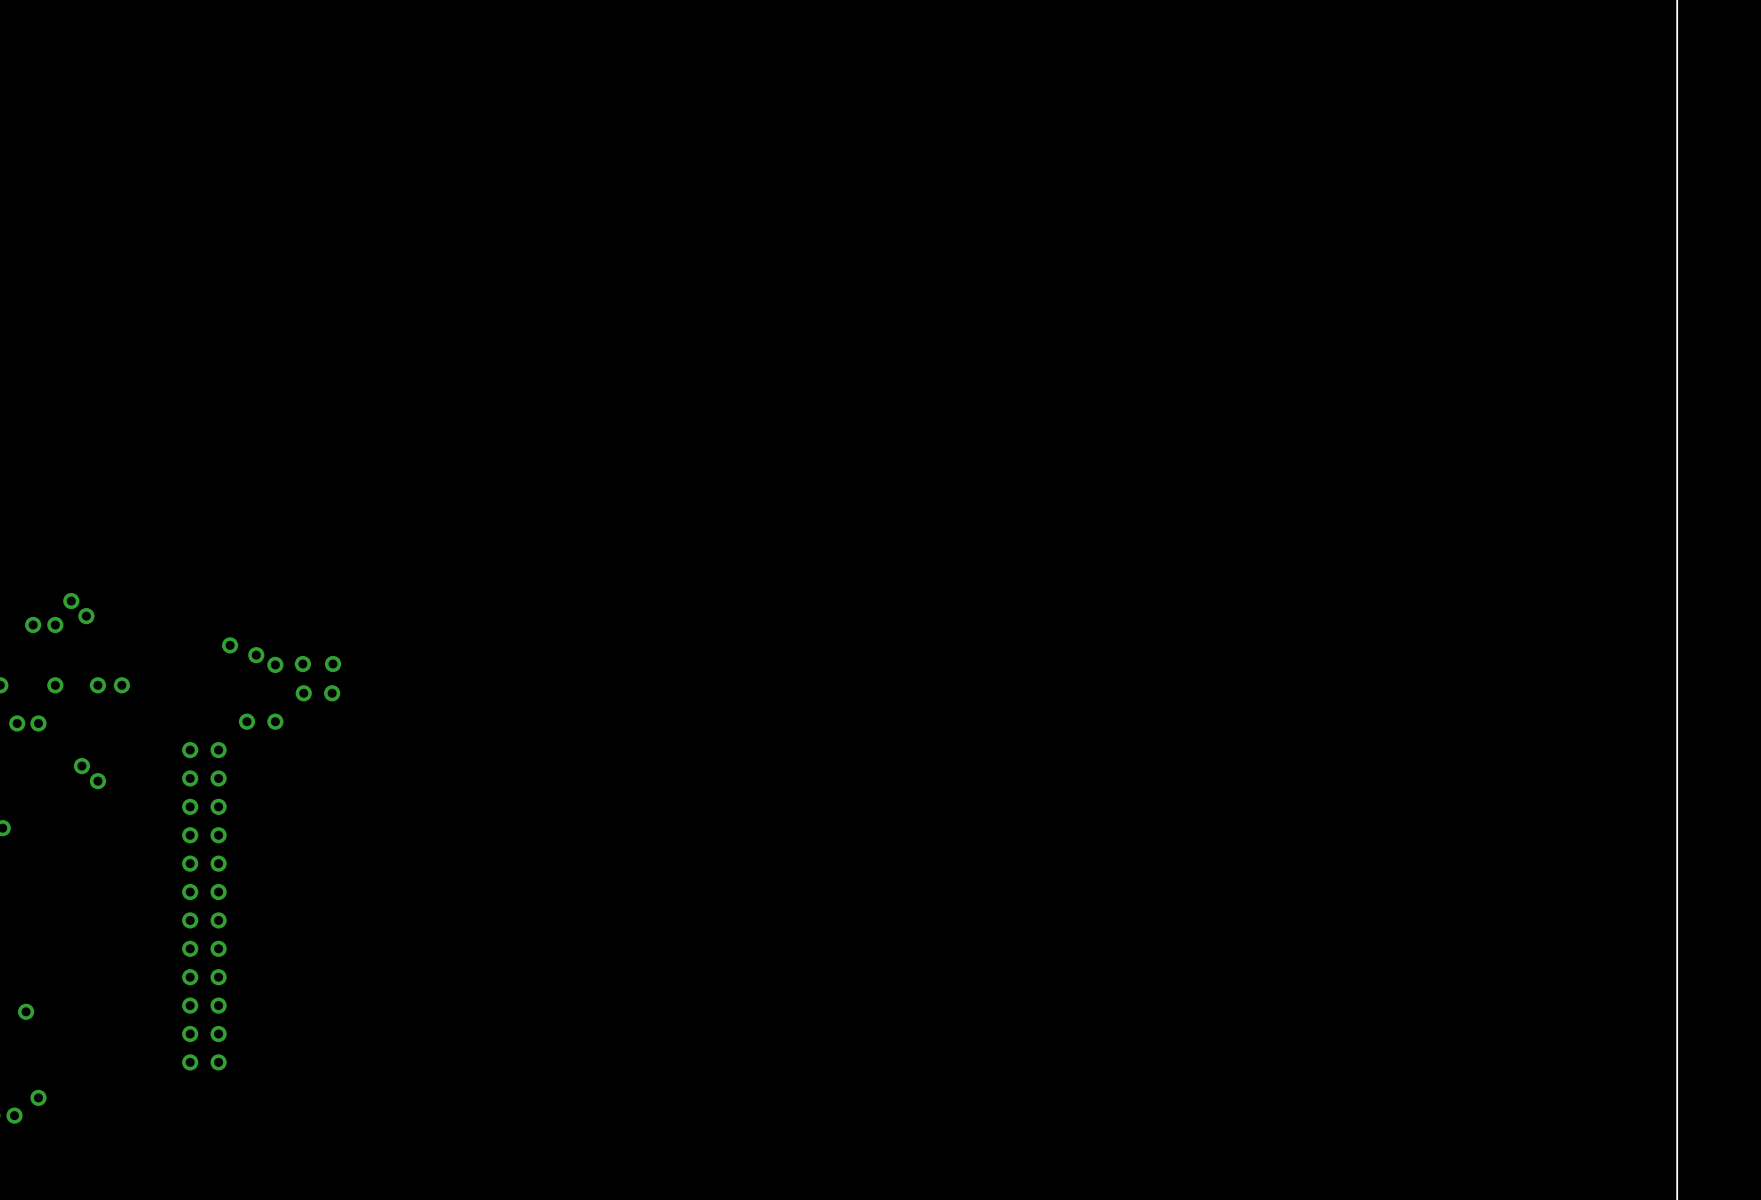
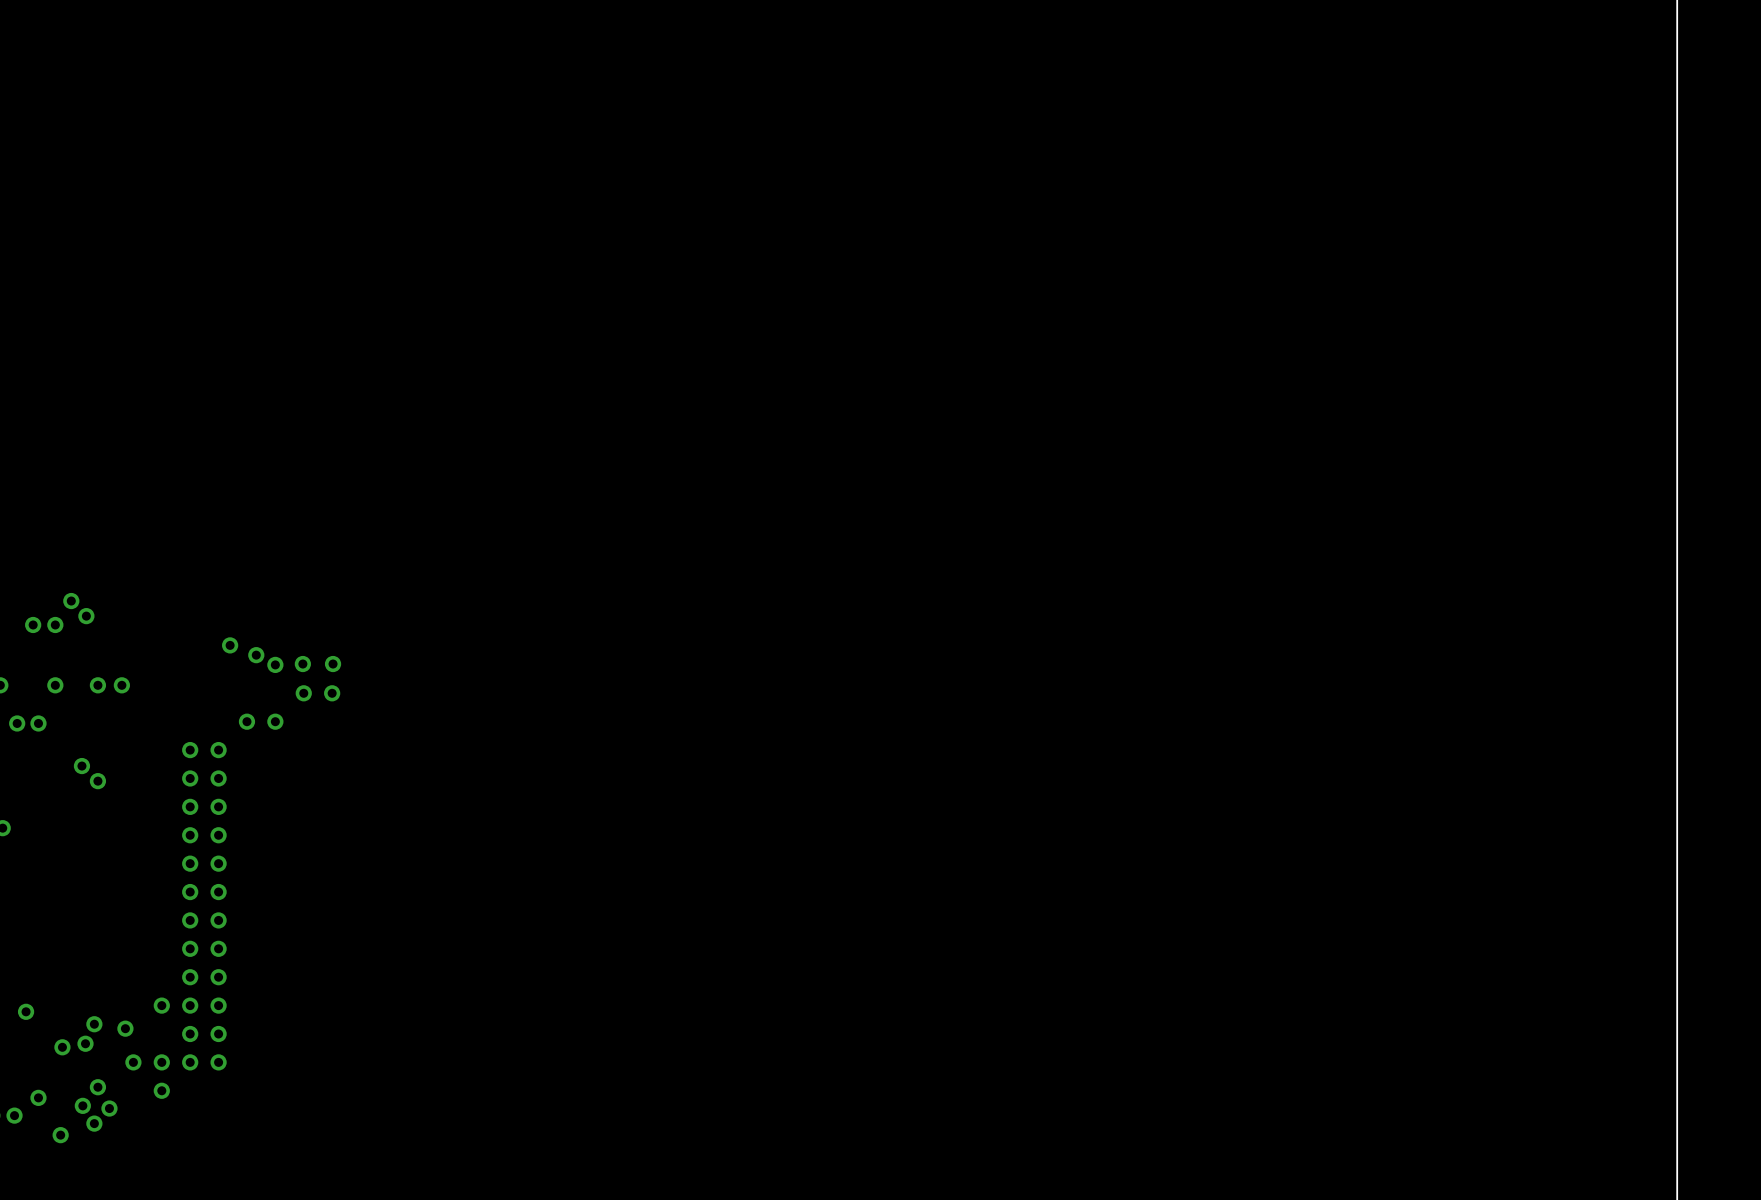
via: none -> (161, 1005)
via: none -> (94, 1024)
via: none -> (125, 1028)
via: none -> (85, 1043)
via: none -> (62, 1047)
via: none -> (133, 1062)
via: none -> (161, 1062)
via: none -> (97, 1087)
via: none -> (161, 1090)
via: none -> (82, 1105)
via: none -> (109, 1108)
via: none -> (94, 1123)
via: none -> (60, 1135)

